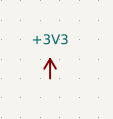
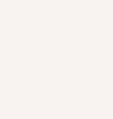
power symbol: +3V3 (50, 68) -> none

